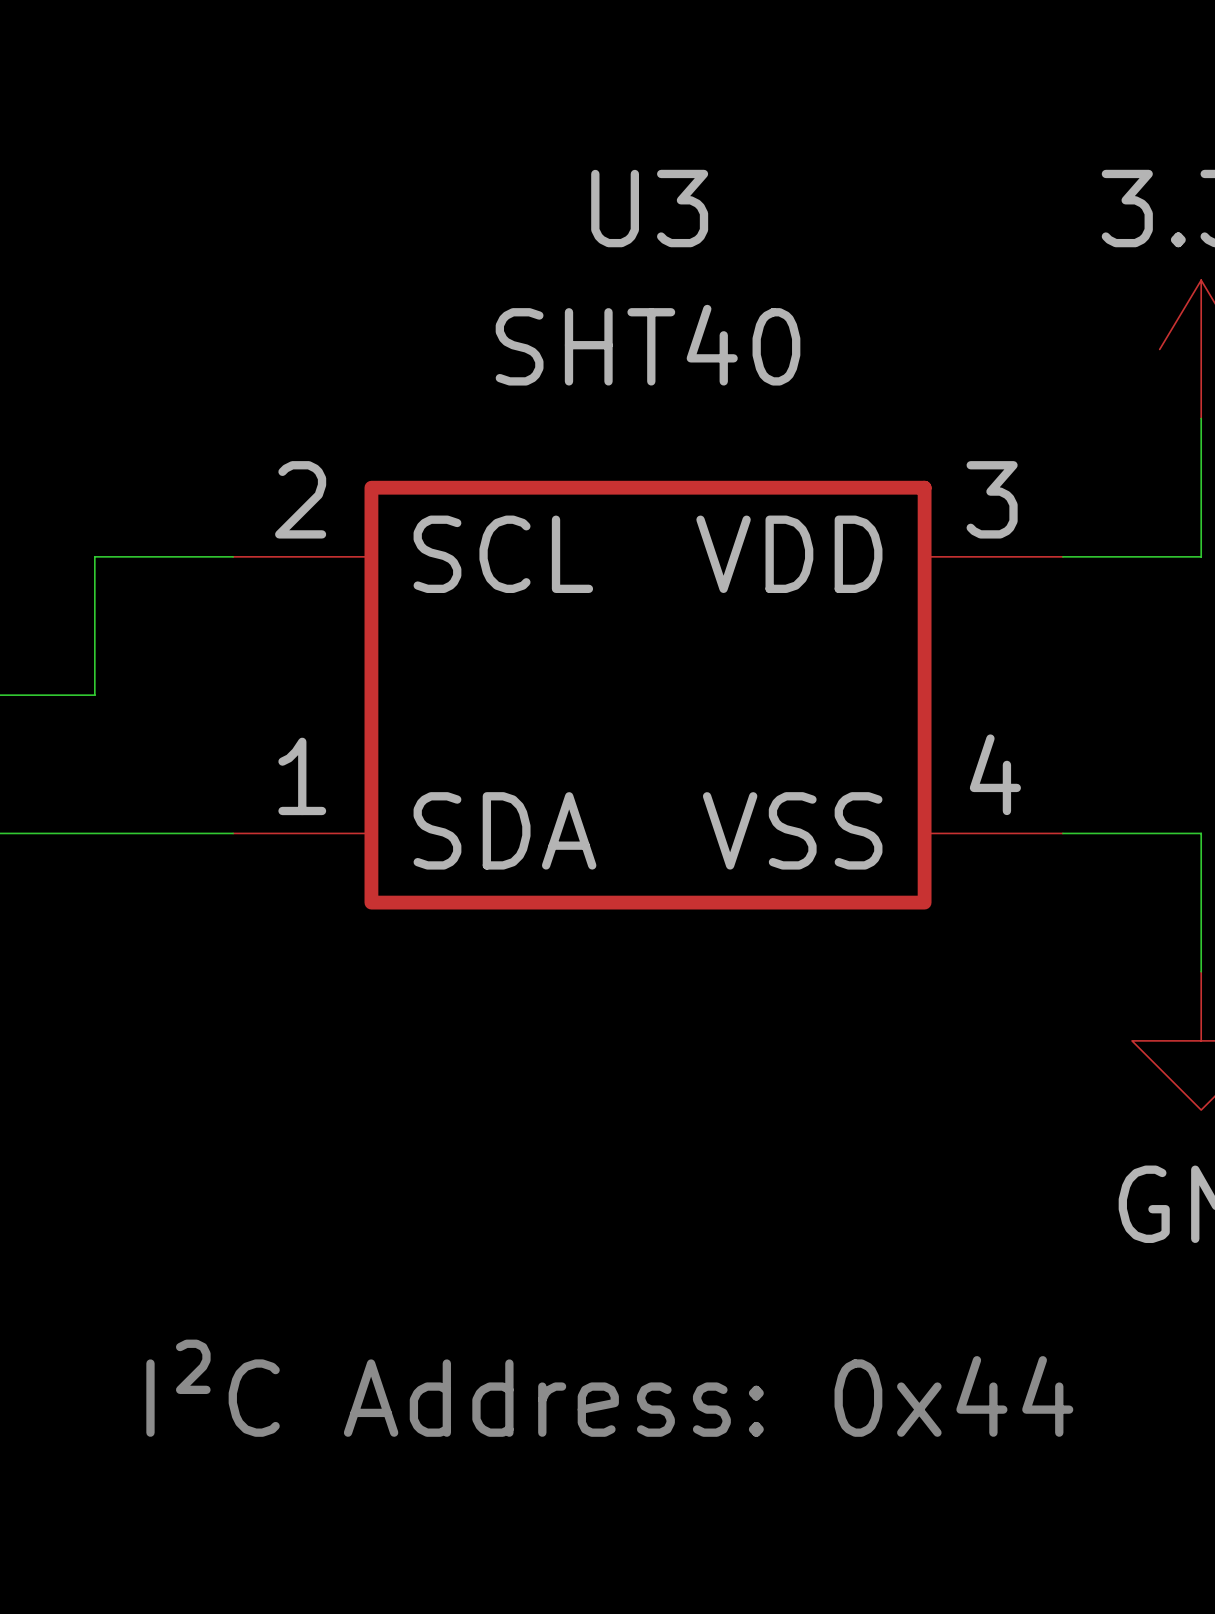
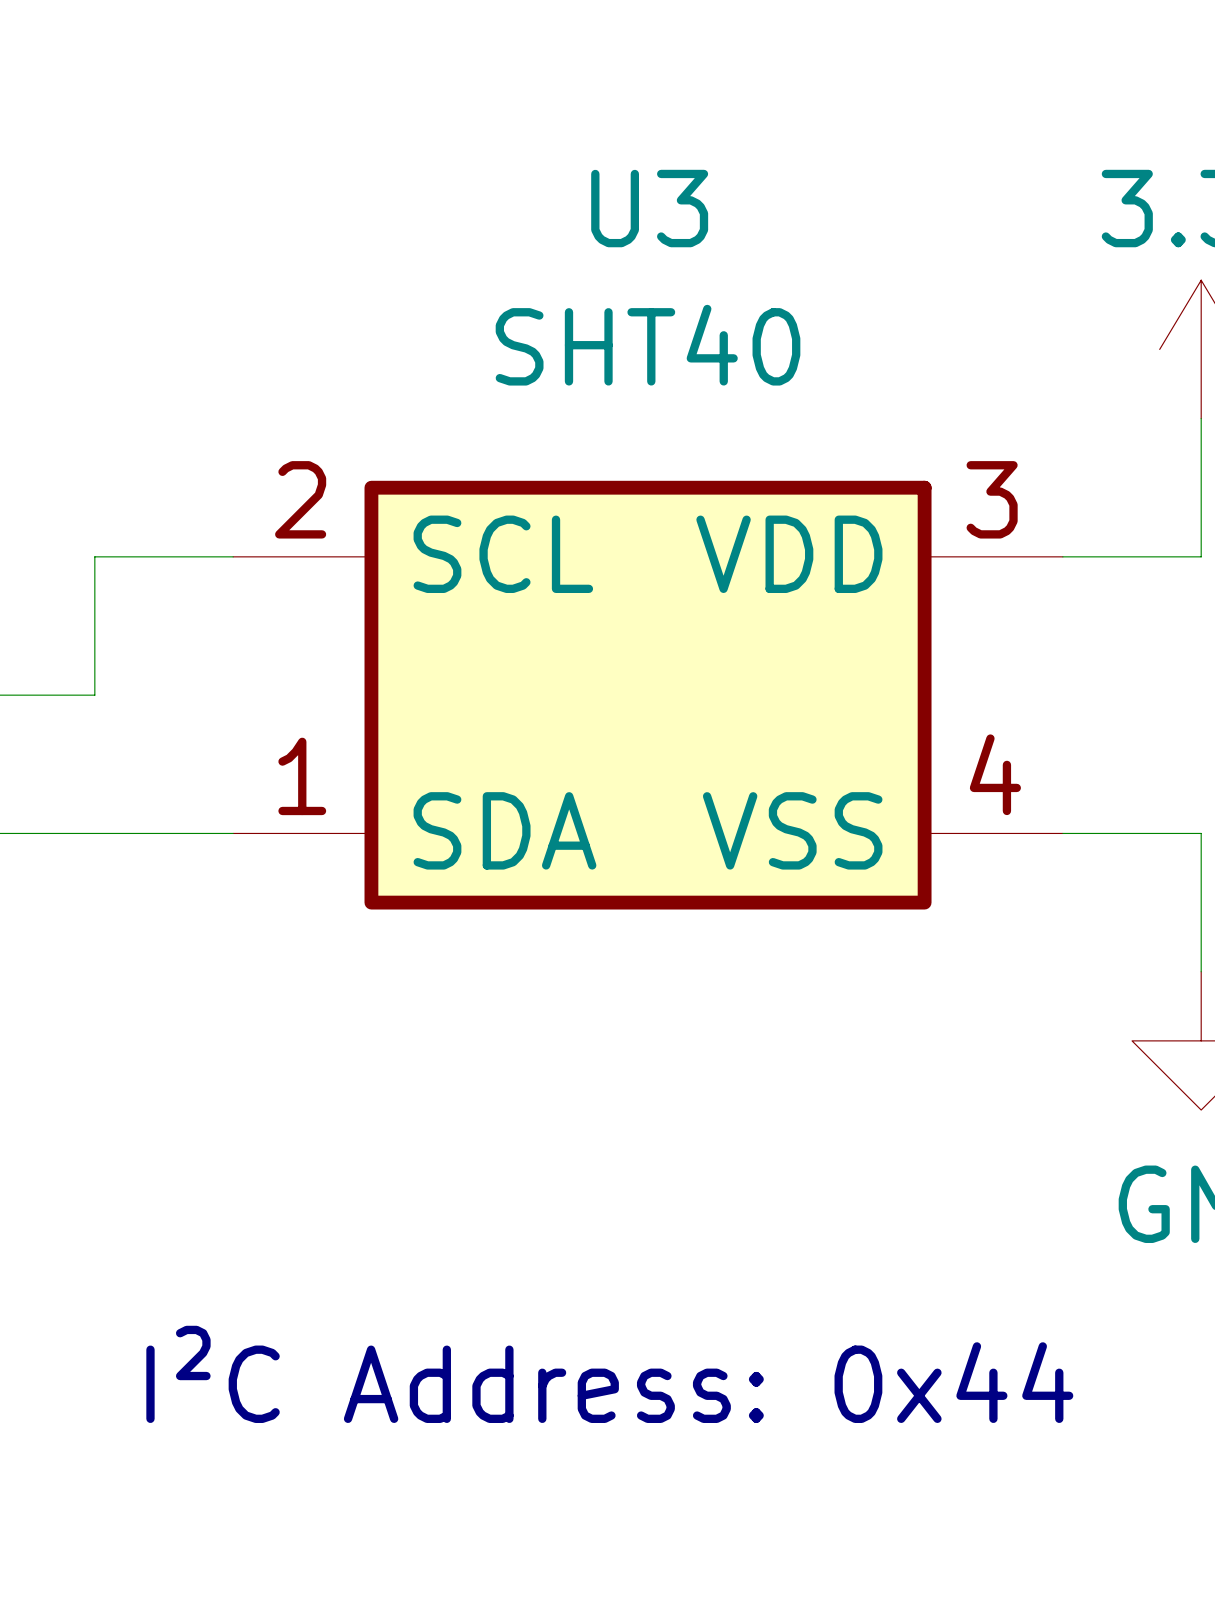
text position: I²C Address: 0x44 (609, 1388) -> I²C Address: 0x44 (609, 1374)

